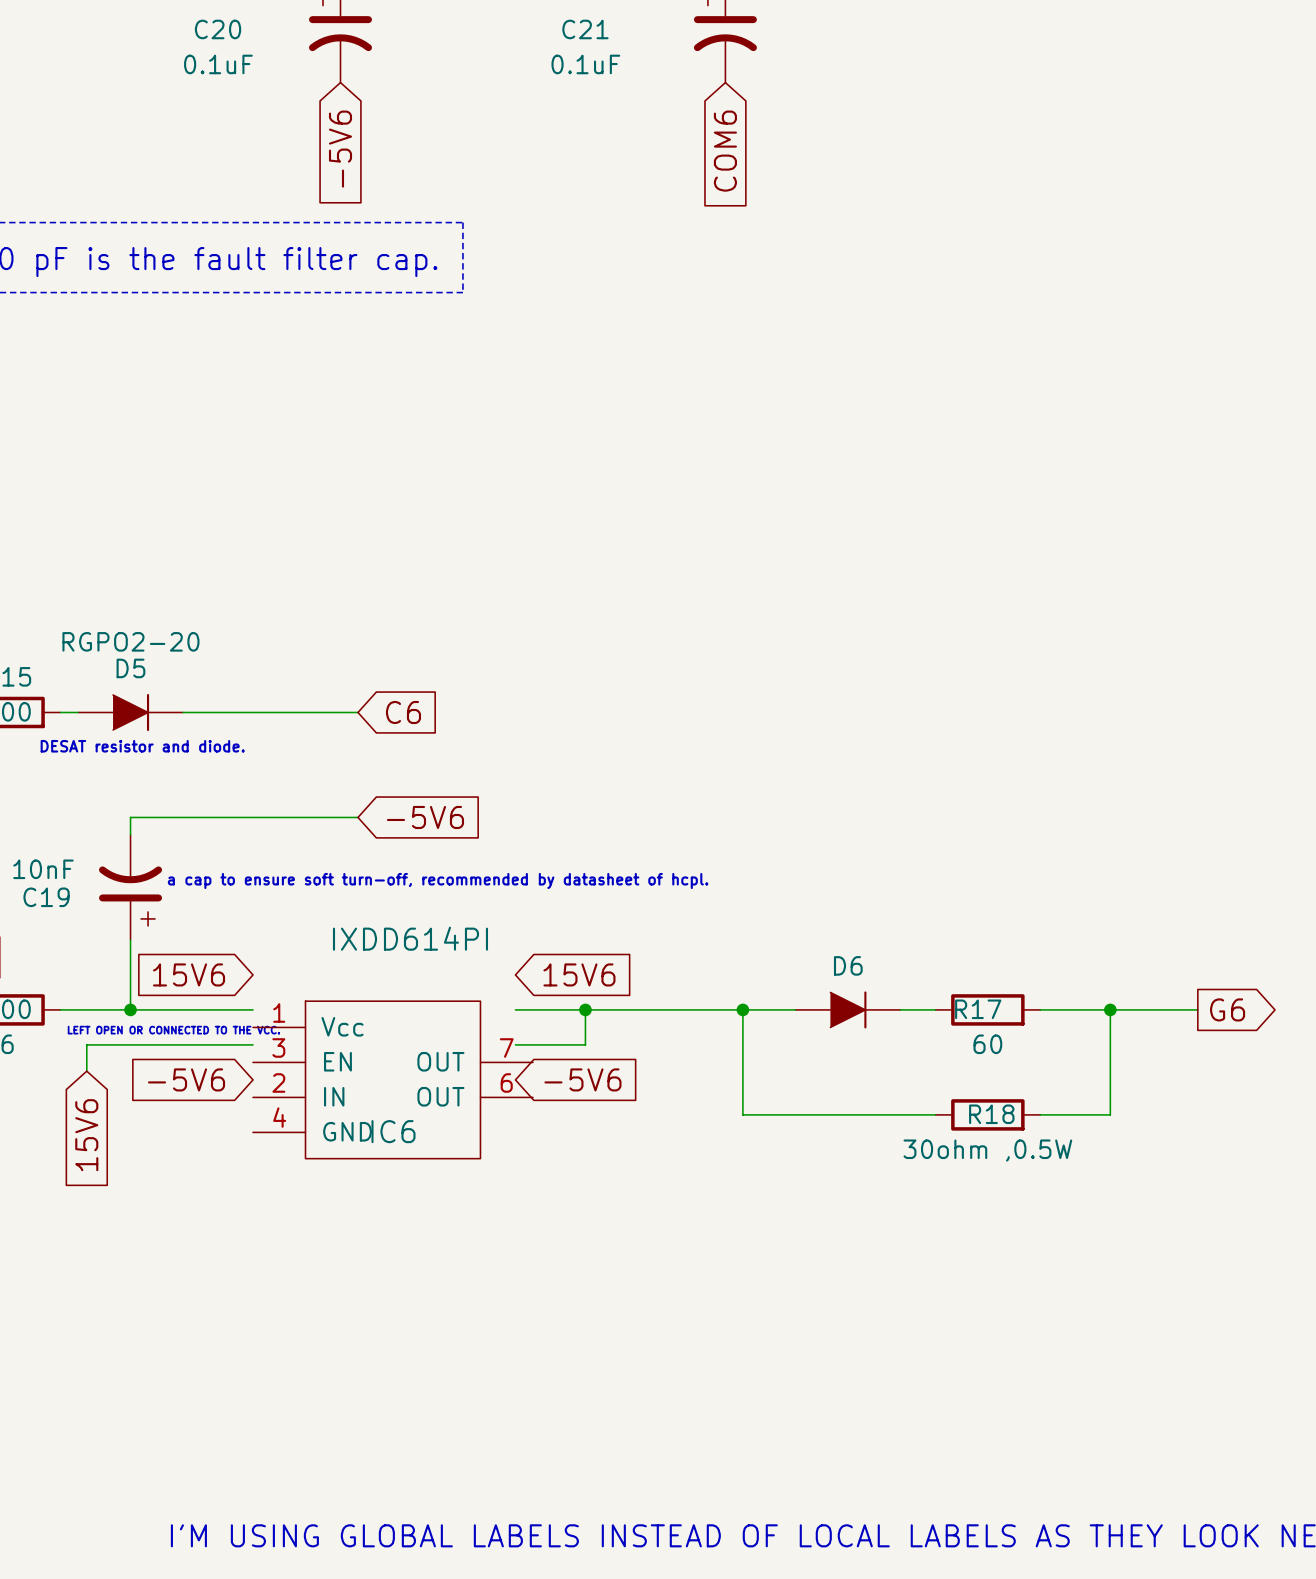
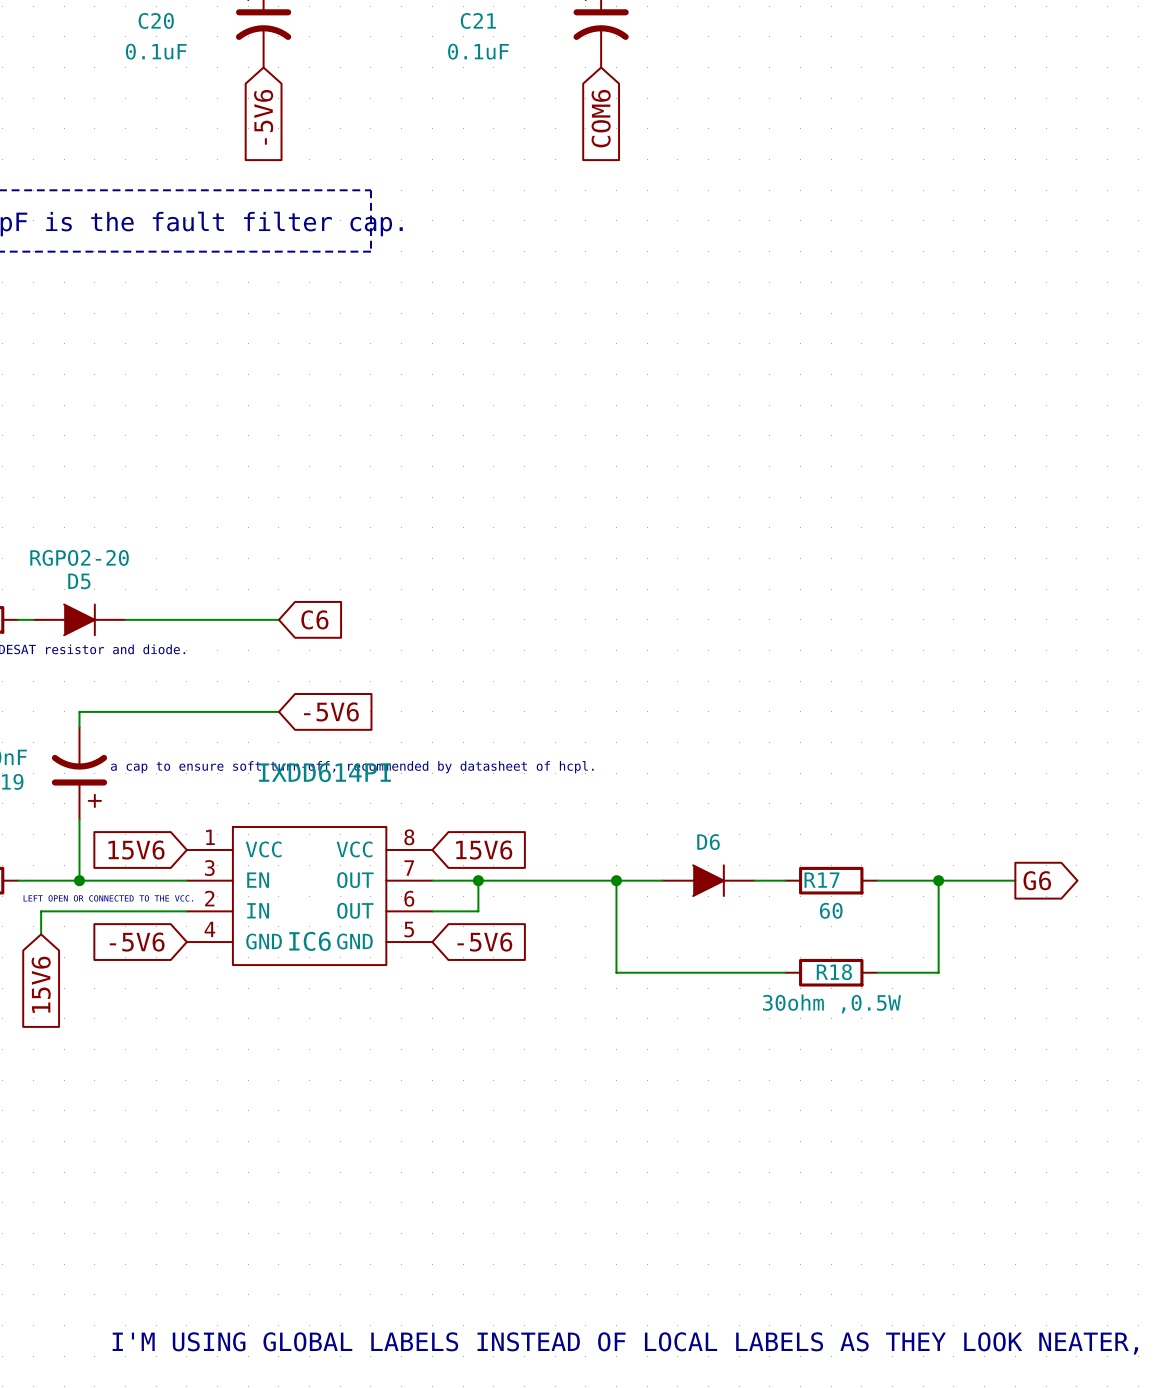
global label position: 15V6 (579, 974) -> 15V6 (484, 850)
IC6 symbol: [253, 1001, 533, 1159] -> [186, 826, 433, 966]
global label position: -5V6 (582, 1079) -> -5V6 (484, 942)

